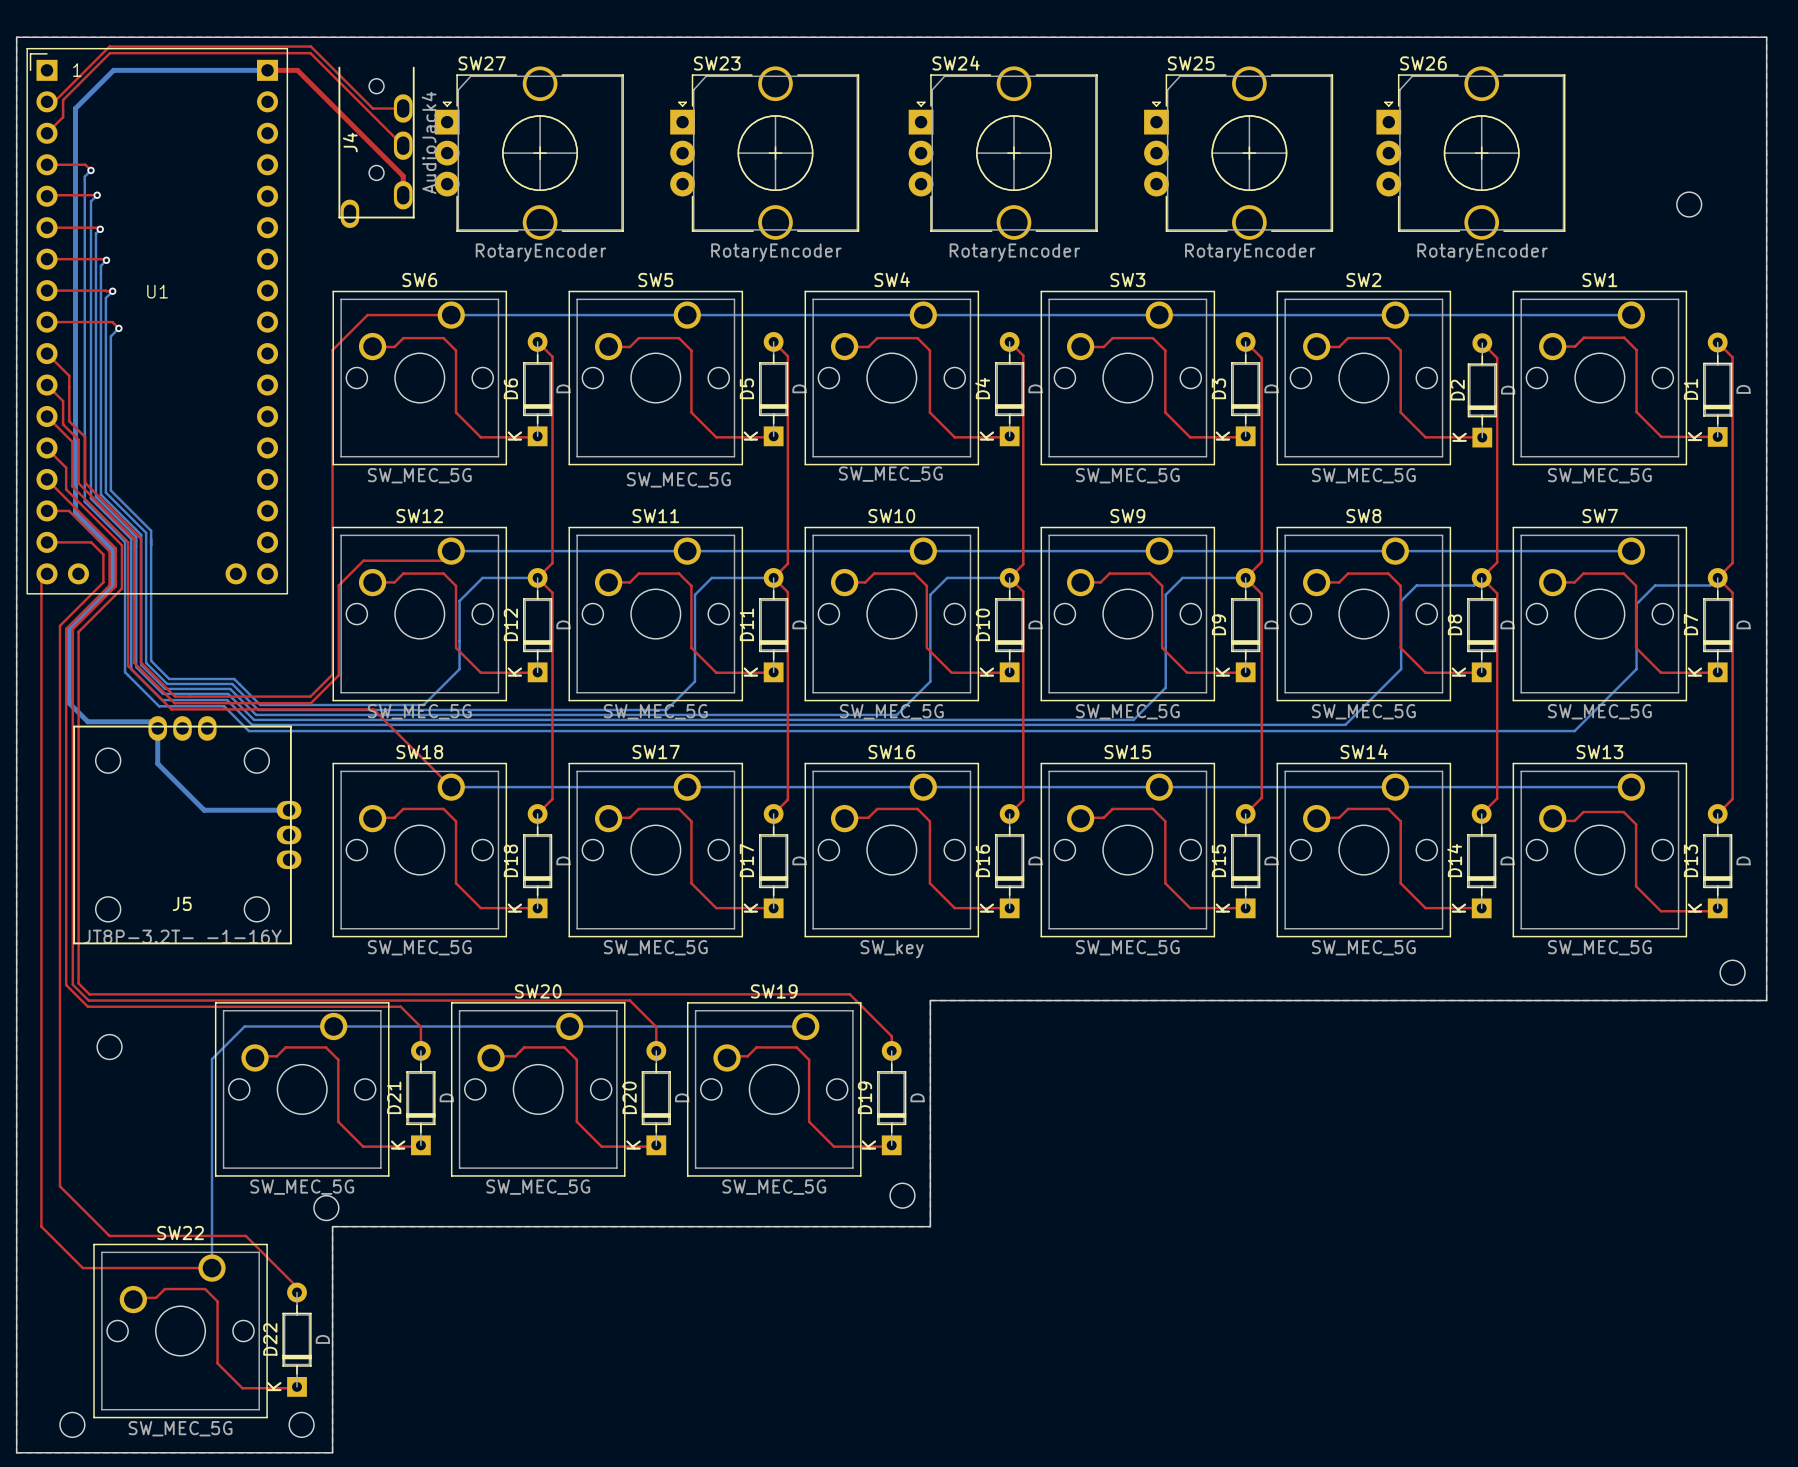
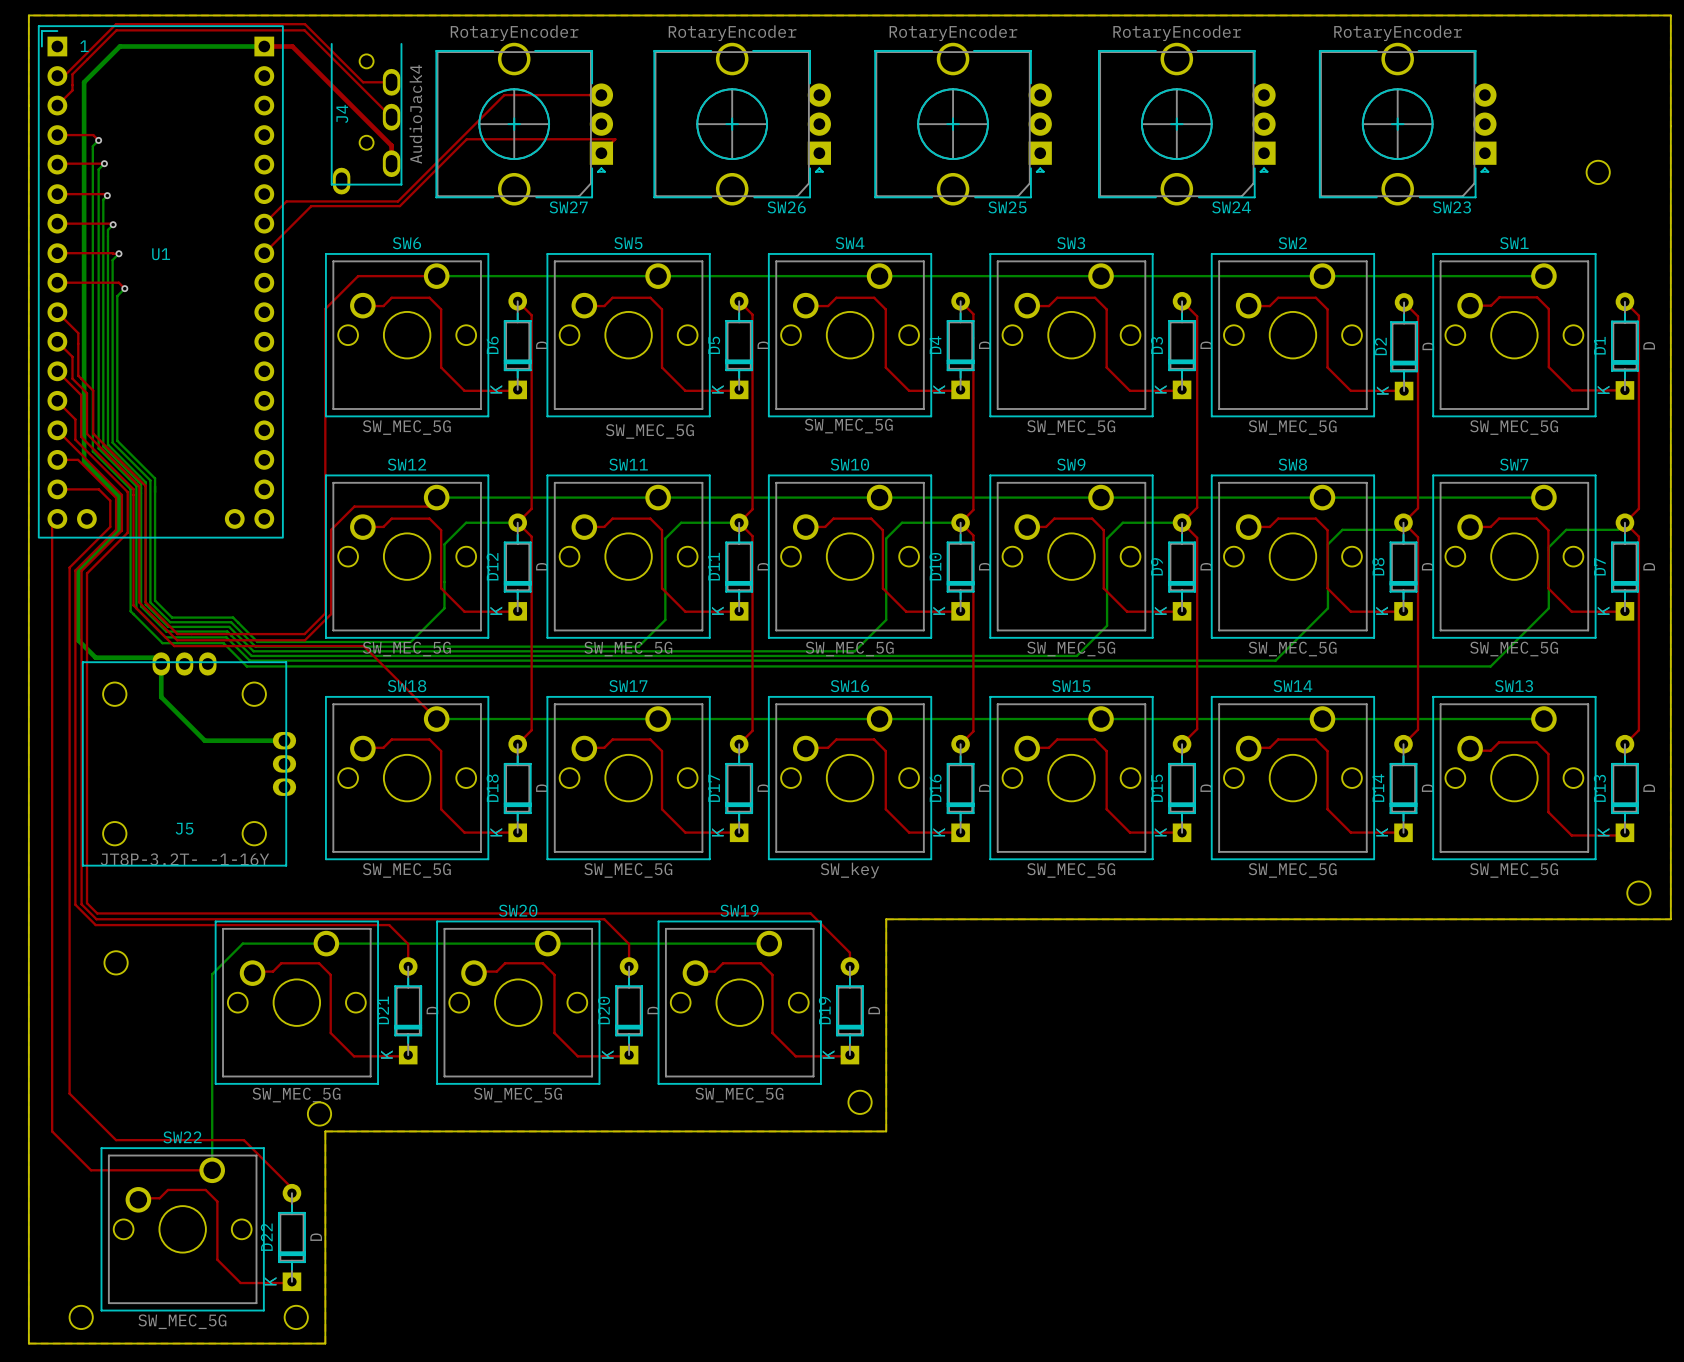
top track: none -> (601, 95) (504, 95) (397, 201) (286, 201) (264, 223)
SW27 rotation: 0° (529, 153) -> 180° (524, 124)
SW23 rotation: 0° (764, 153) -> 180° (1407, 124)
SW23 position: (764, 153) -> (1407, 124)
SW24 rotation: 0° (1003, 153) -> 180° (1186, 124)
SW24 position: (1003, 153) -> (1186, 124)
SW25 rotation: 0° (1238, 153) -> 180° (963, 124)
SW25 position: (1238, 153) -> (963, 124)
SW26 rotation: 0° (1470, 153) -> 180° (742, 124)
SW26 position: (1470, 153) -> (742, 124)
top track: none -> (601, 153) (615, 139) (466, 139) (399, 206) (311, 206) (264, 253)

